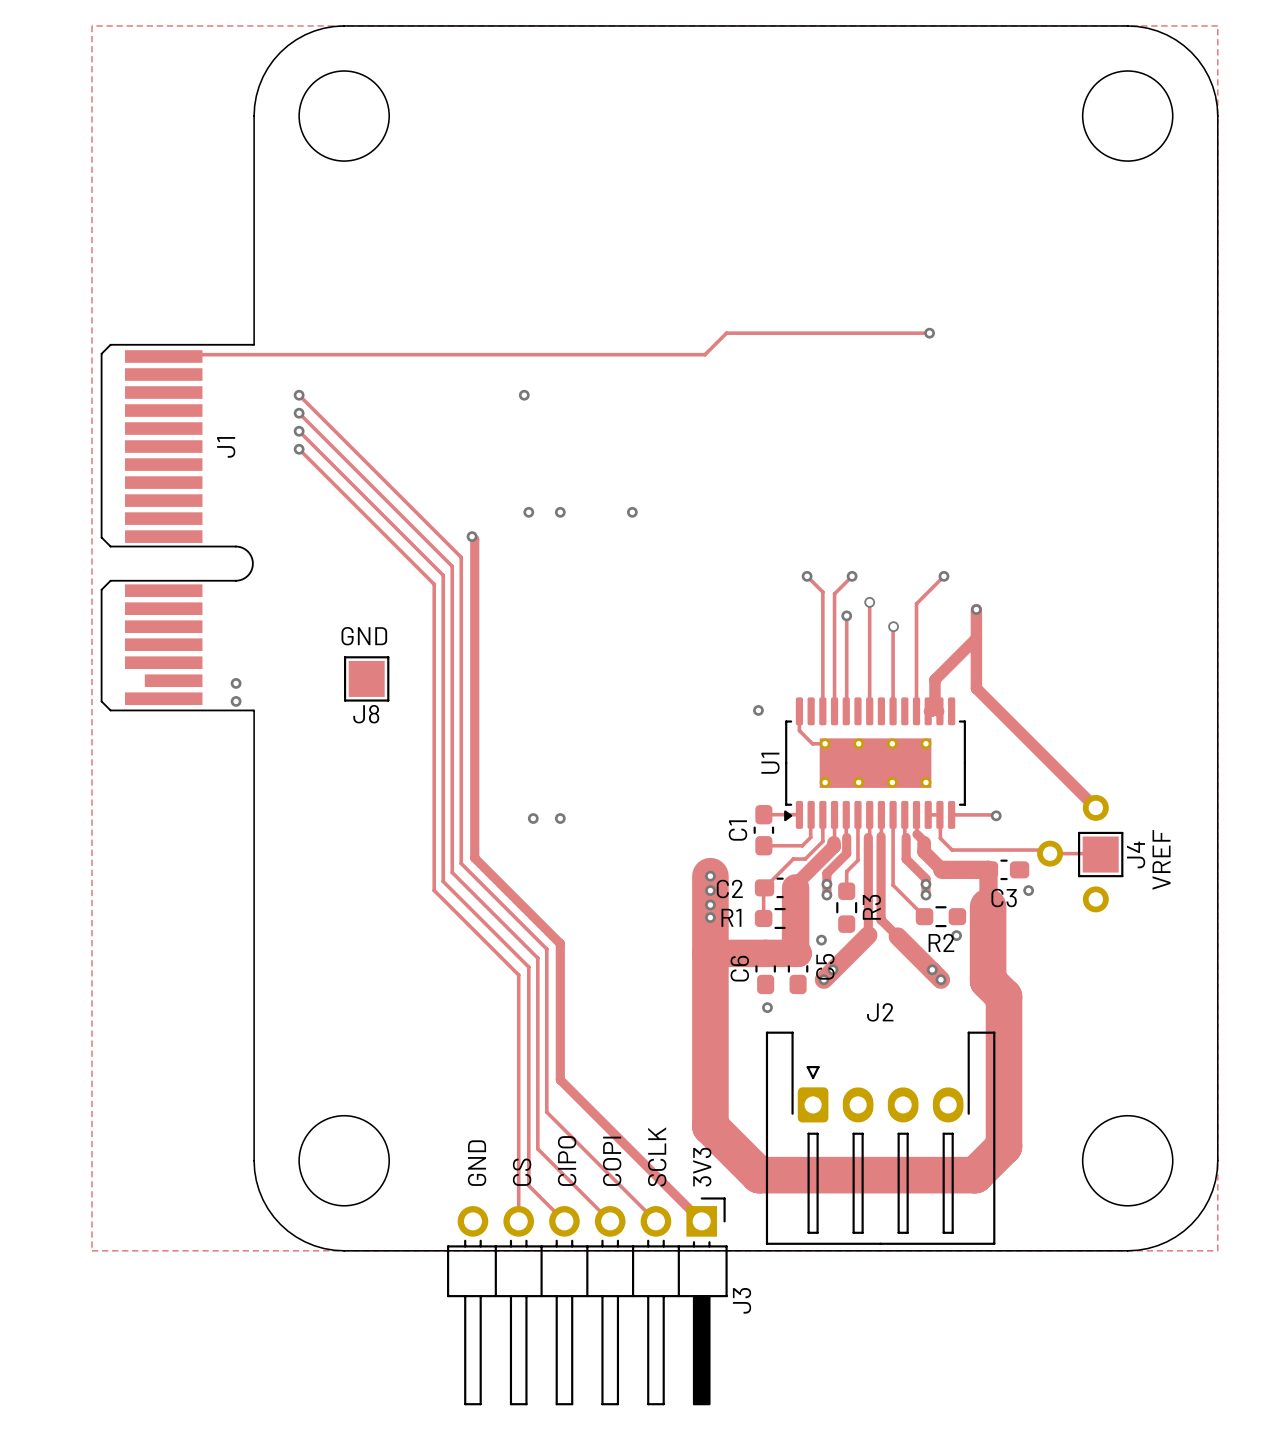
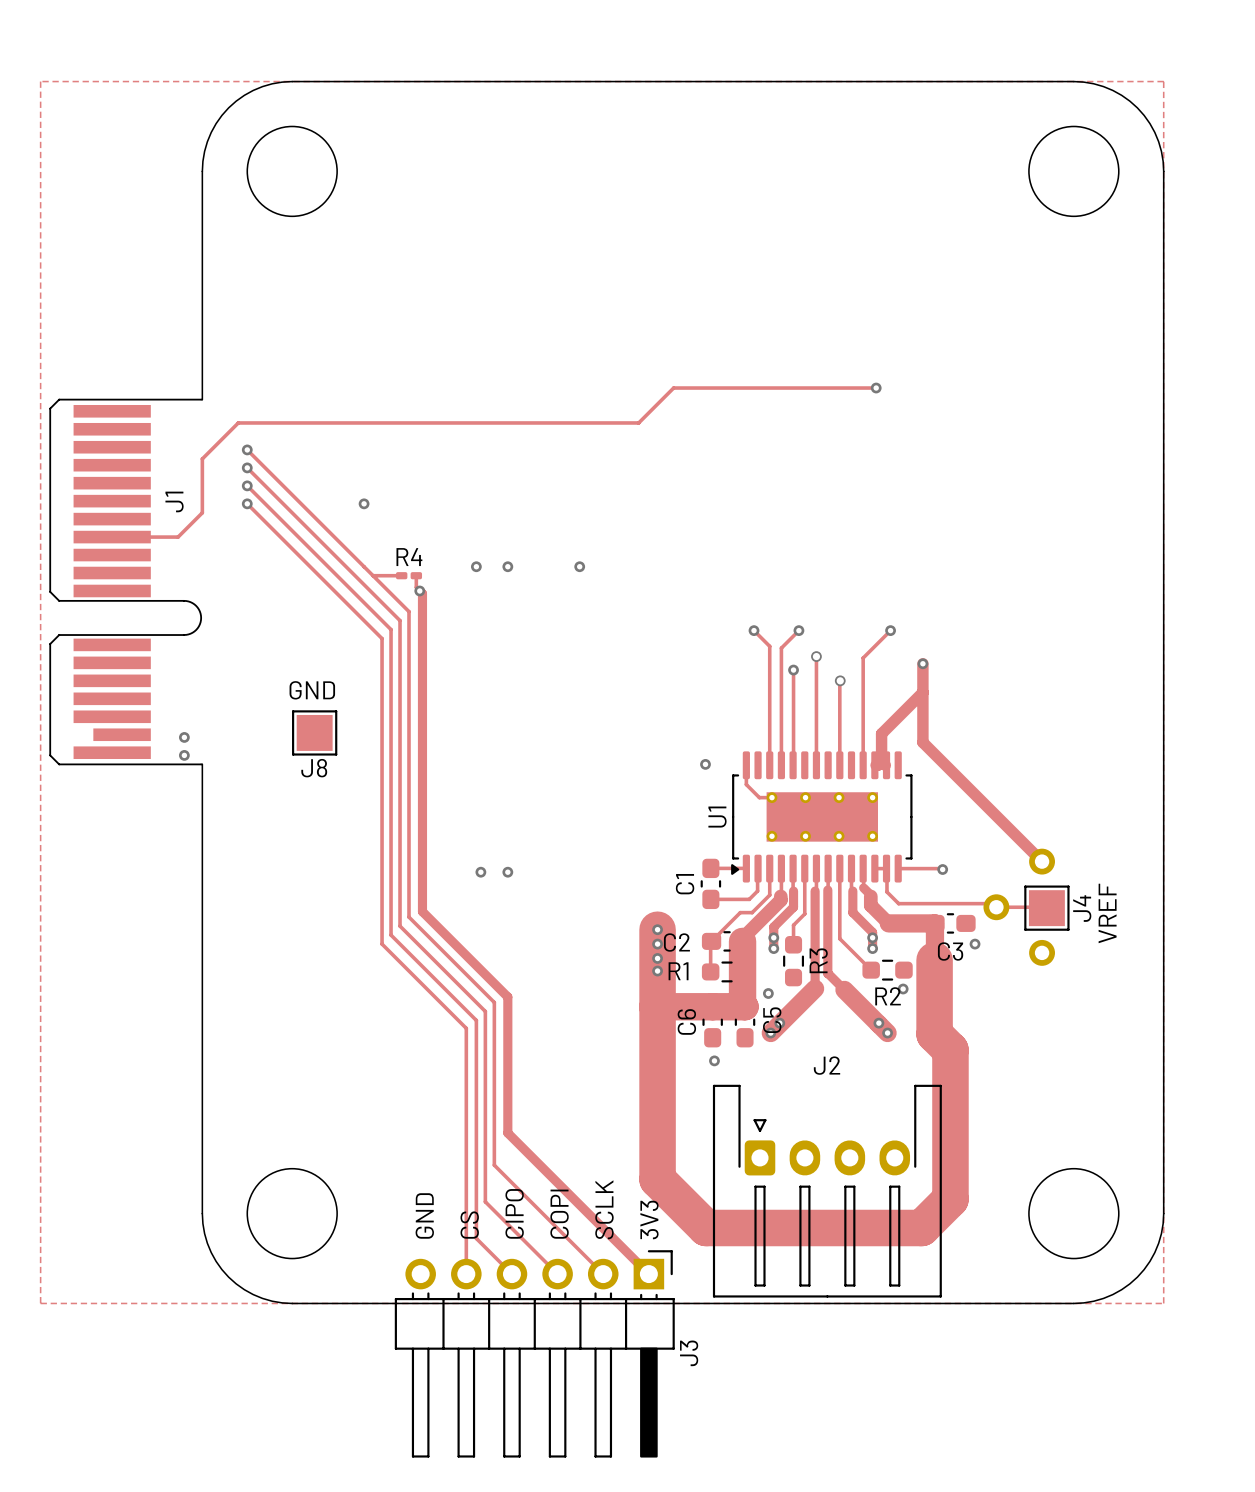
track: (165, 354) (705, 354) -> (112, 537) (178, 537) (202, 512) (202, 458) (238, 422) (638, 422) (652, 409)
via: (524, 395) -> none
via: none -> (364, 503)
track: none -> (373, 575) (401, 575)
R4: none -> (409, 575)
track: none -> (416, 575) (416, 587) (419, 590)

